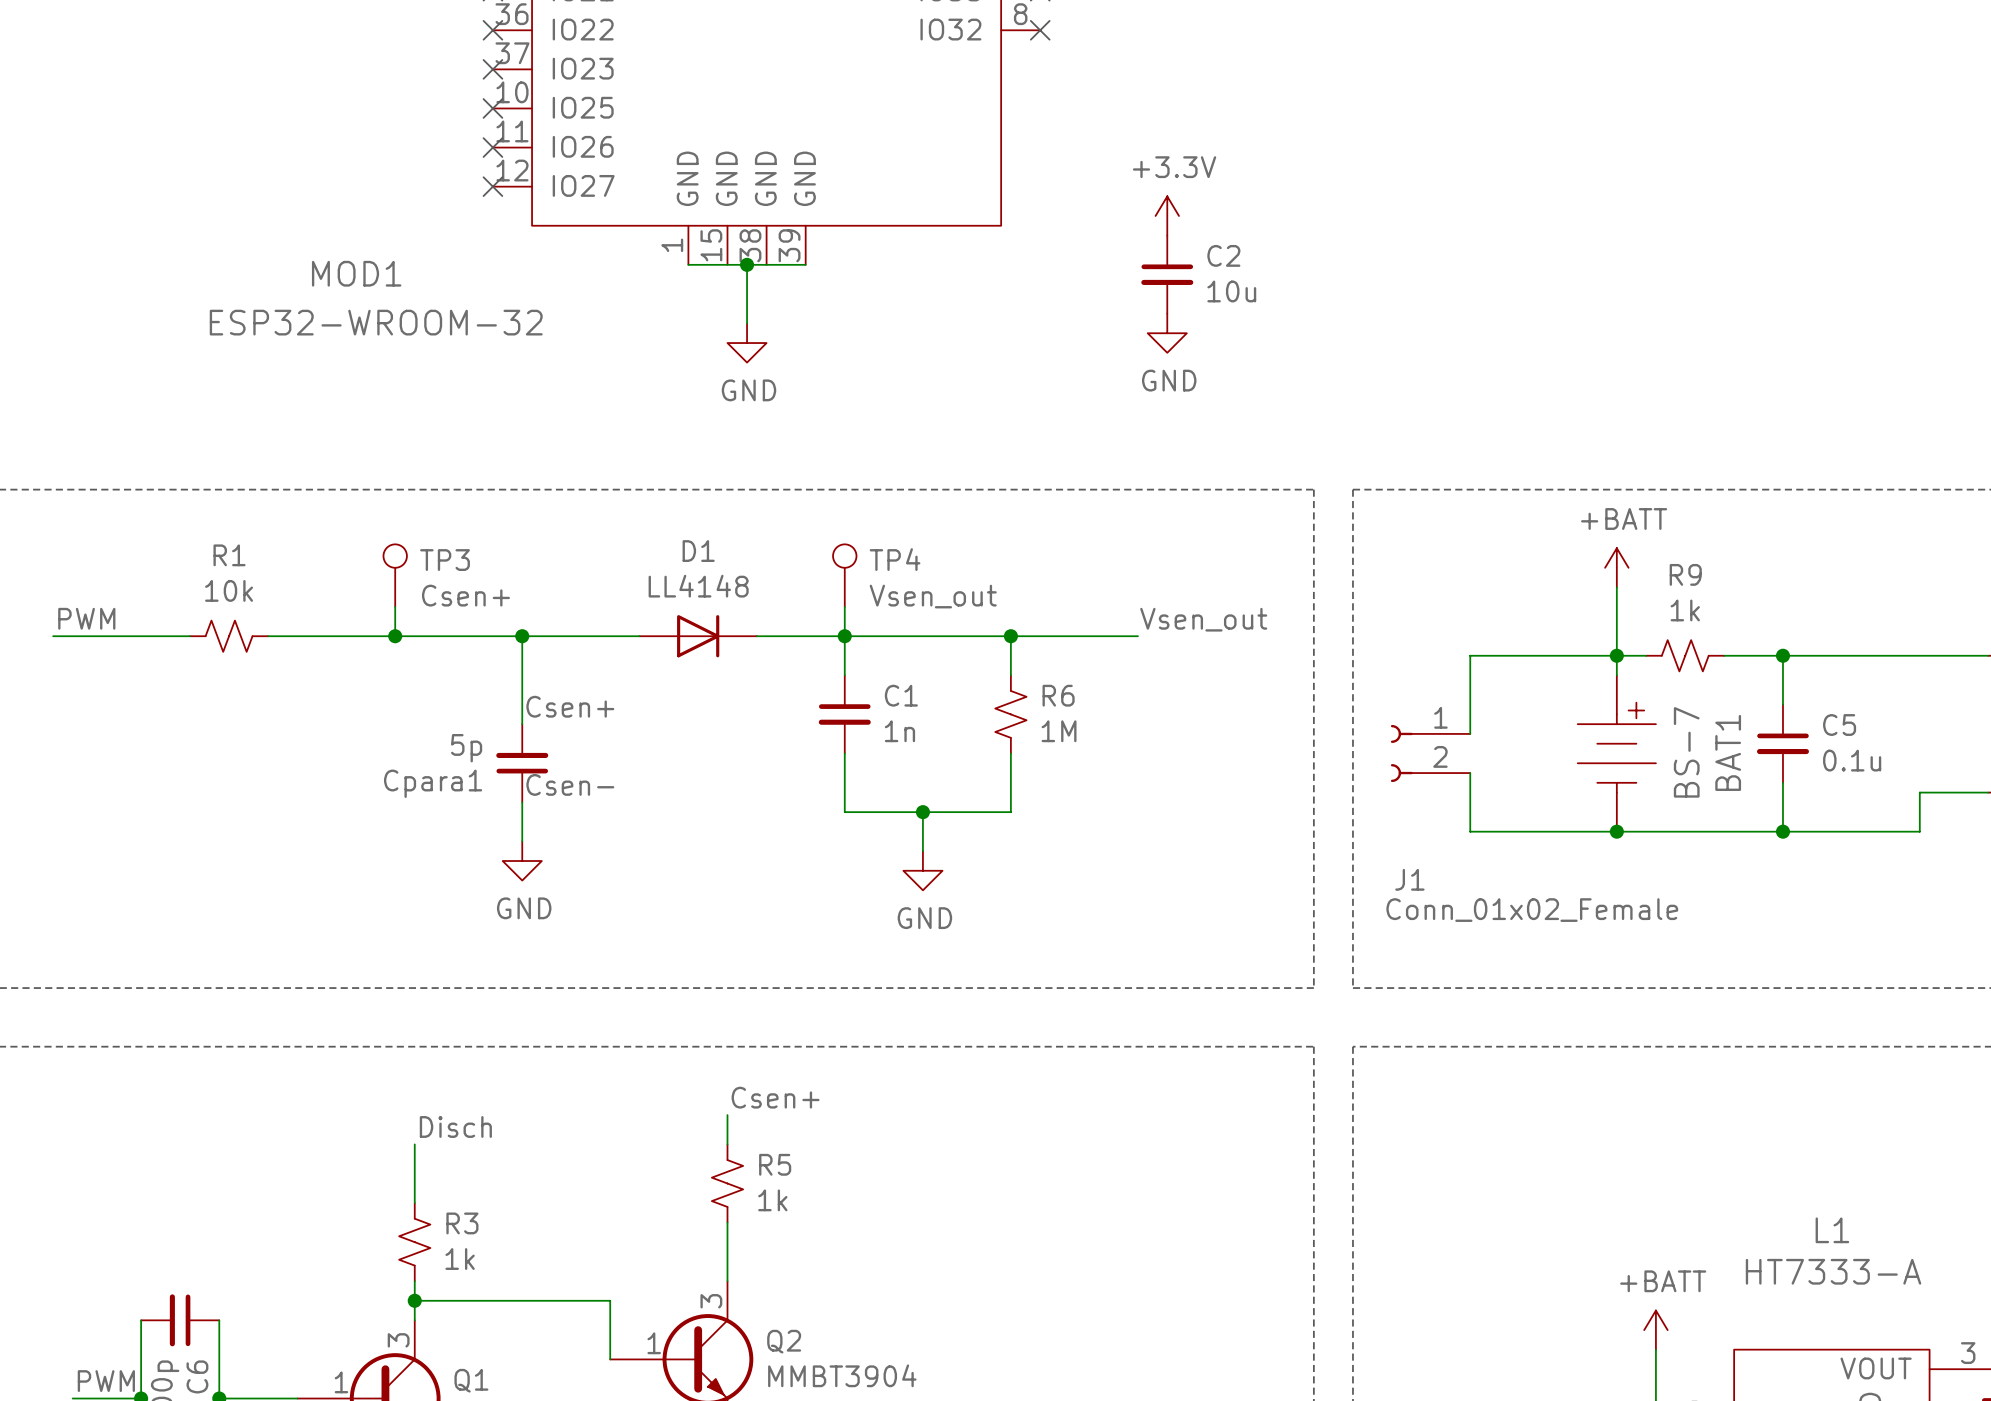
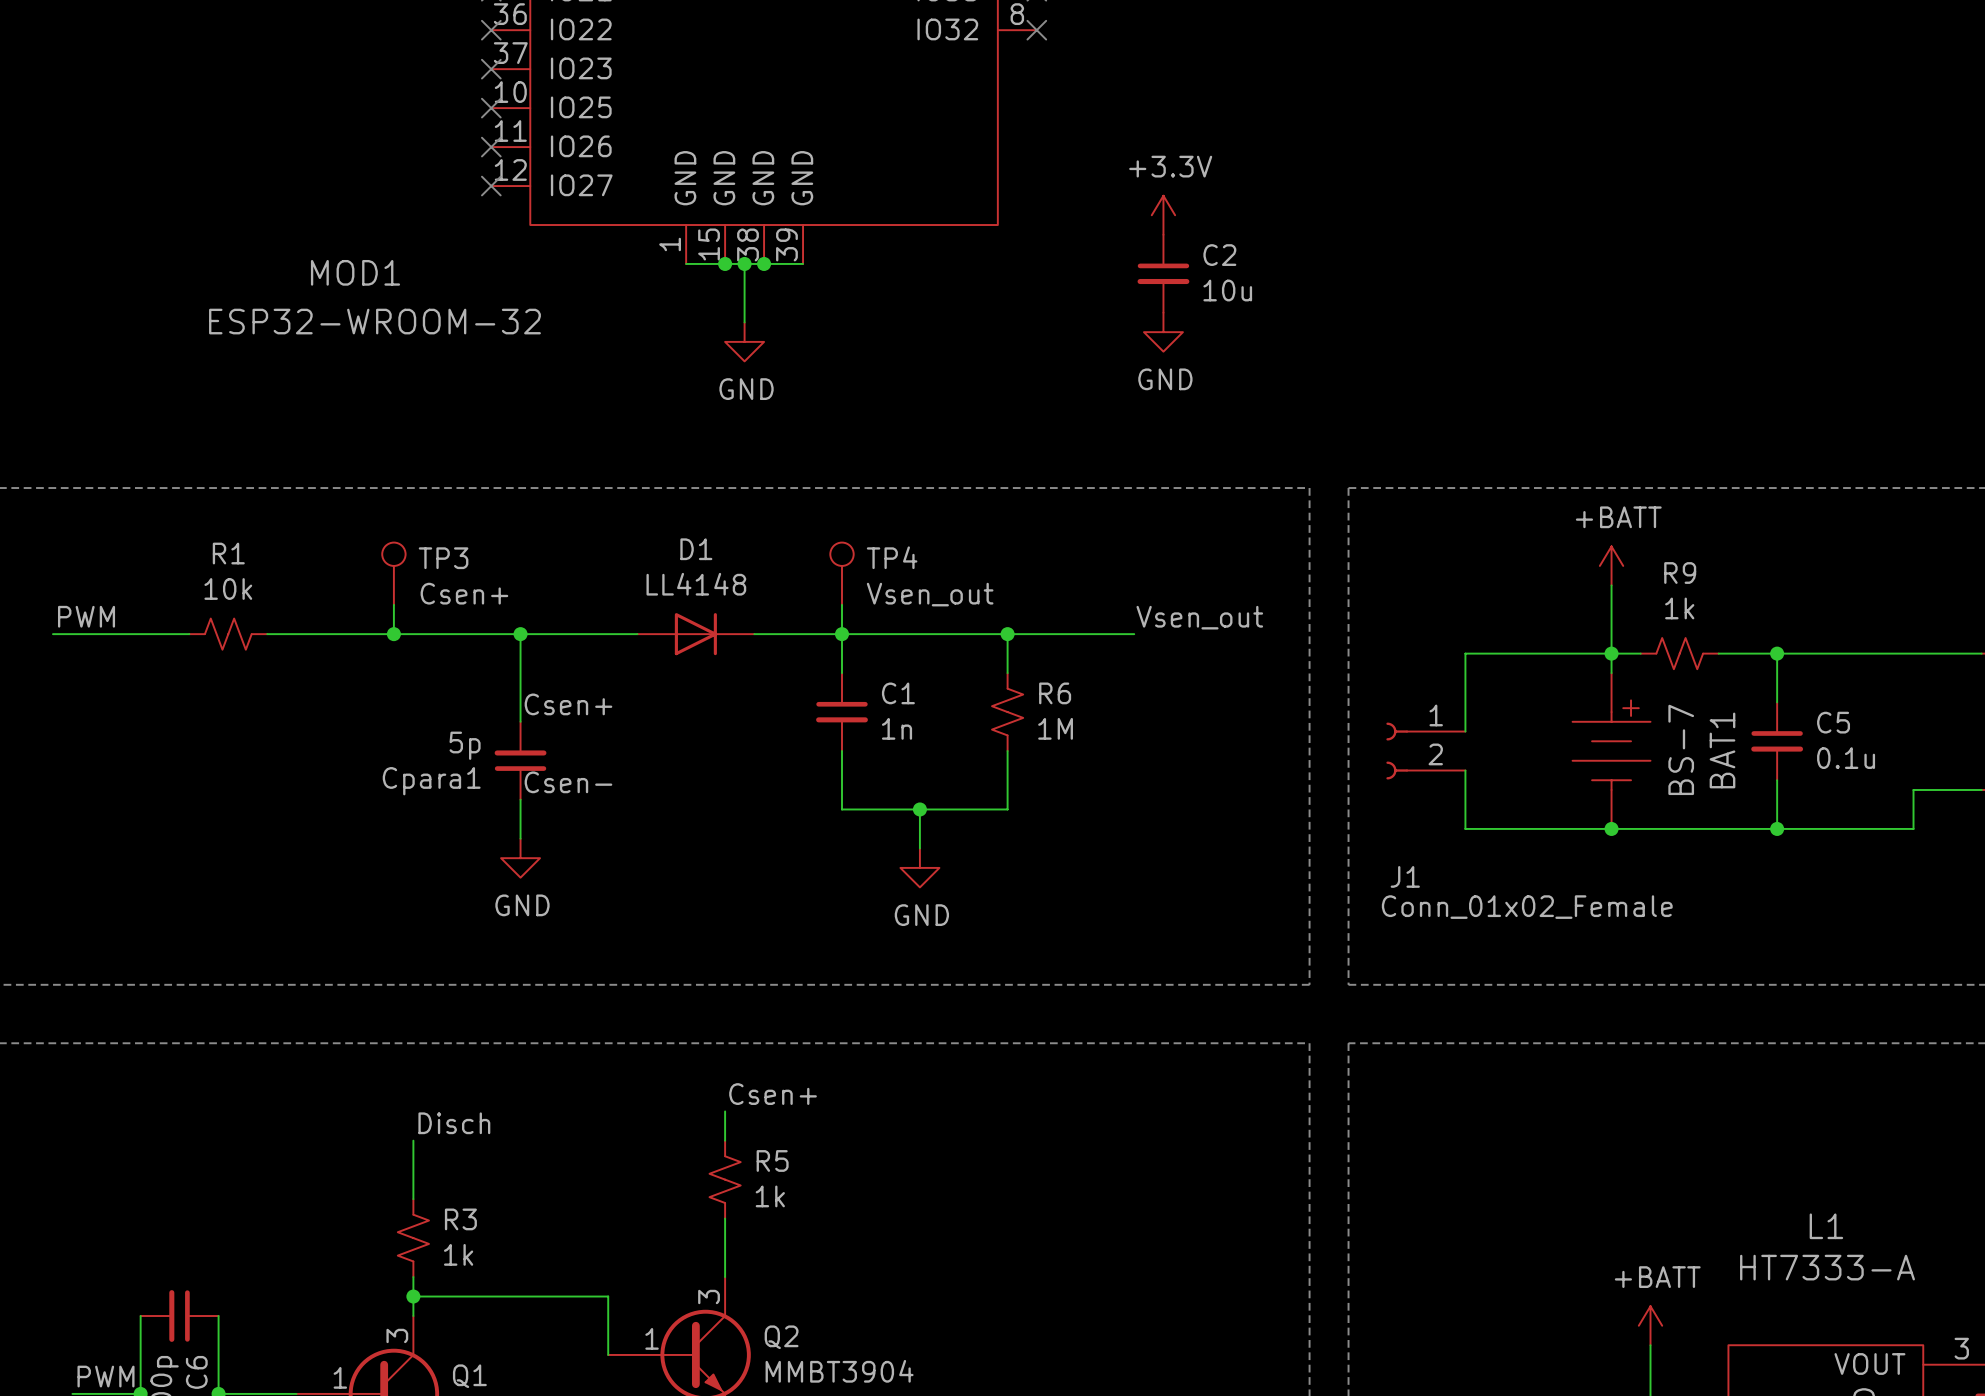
junction: none -> (725, 263)
junction: none -> (764, 263)

